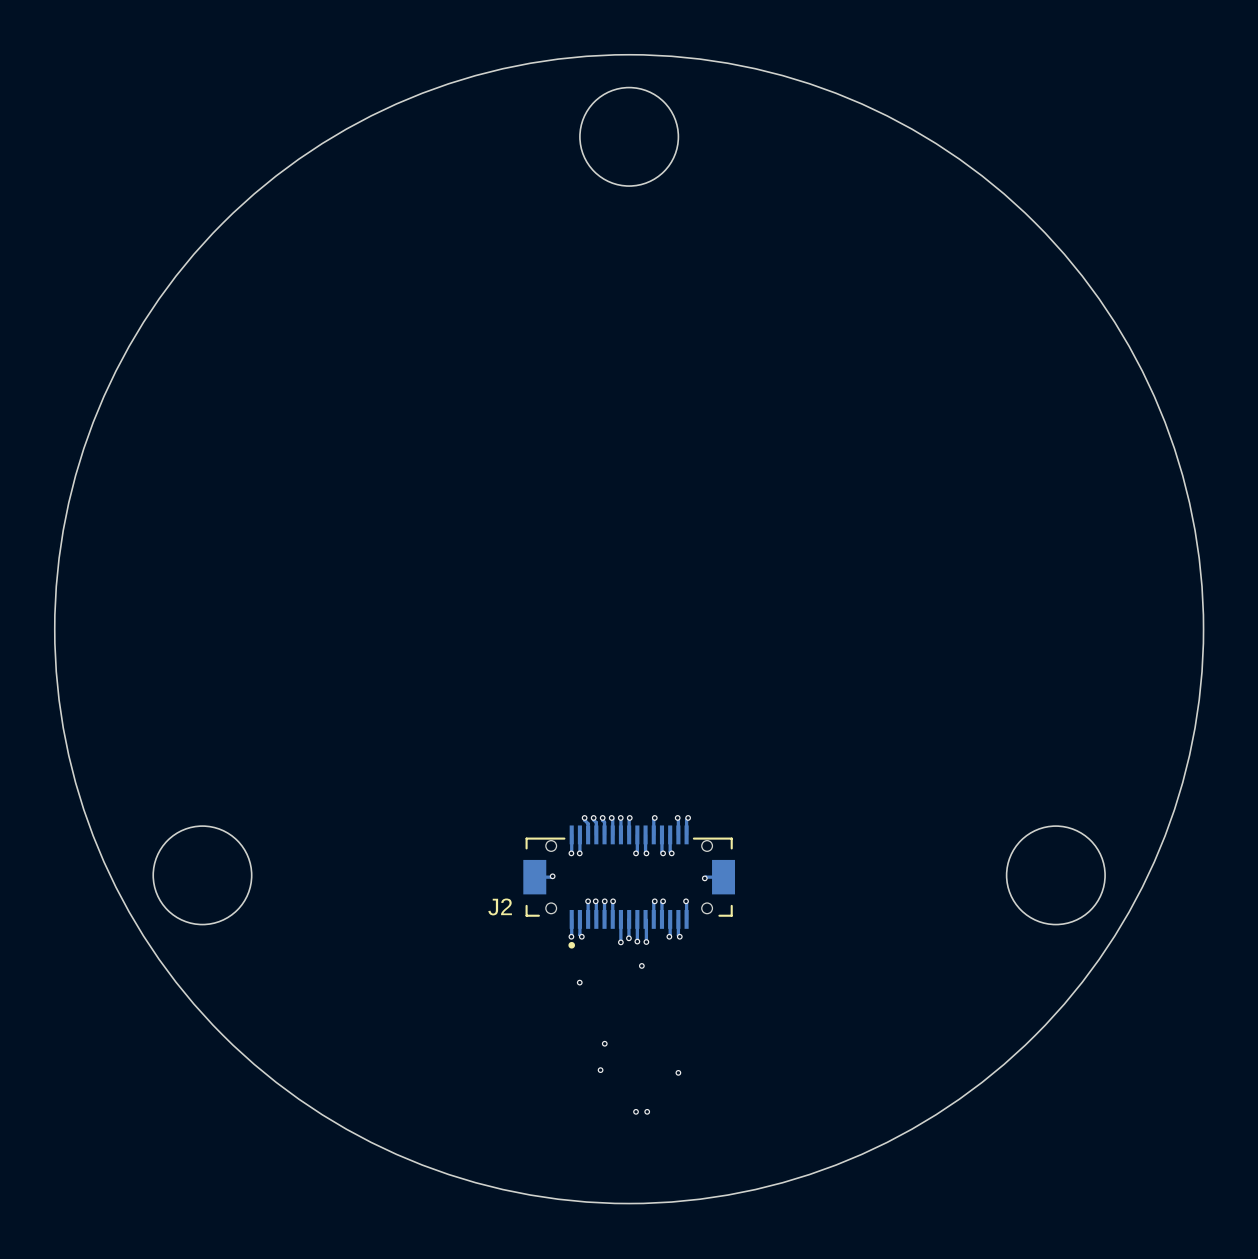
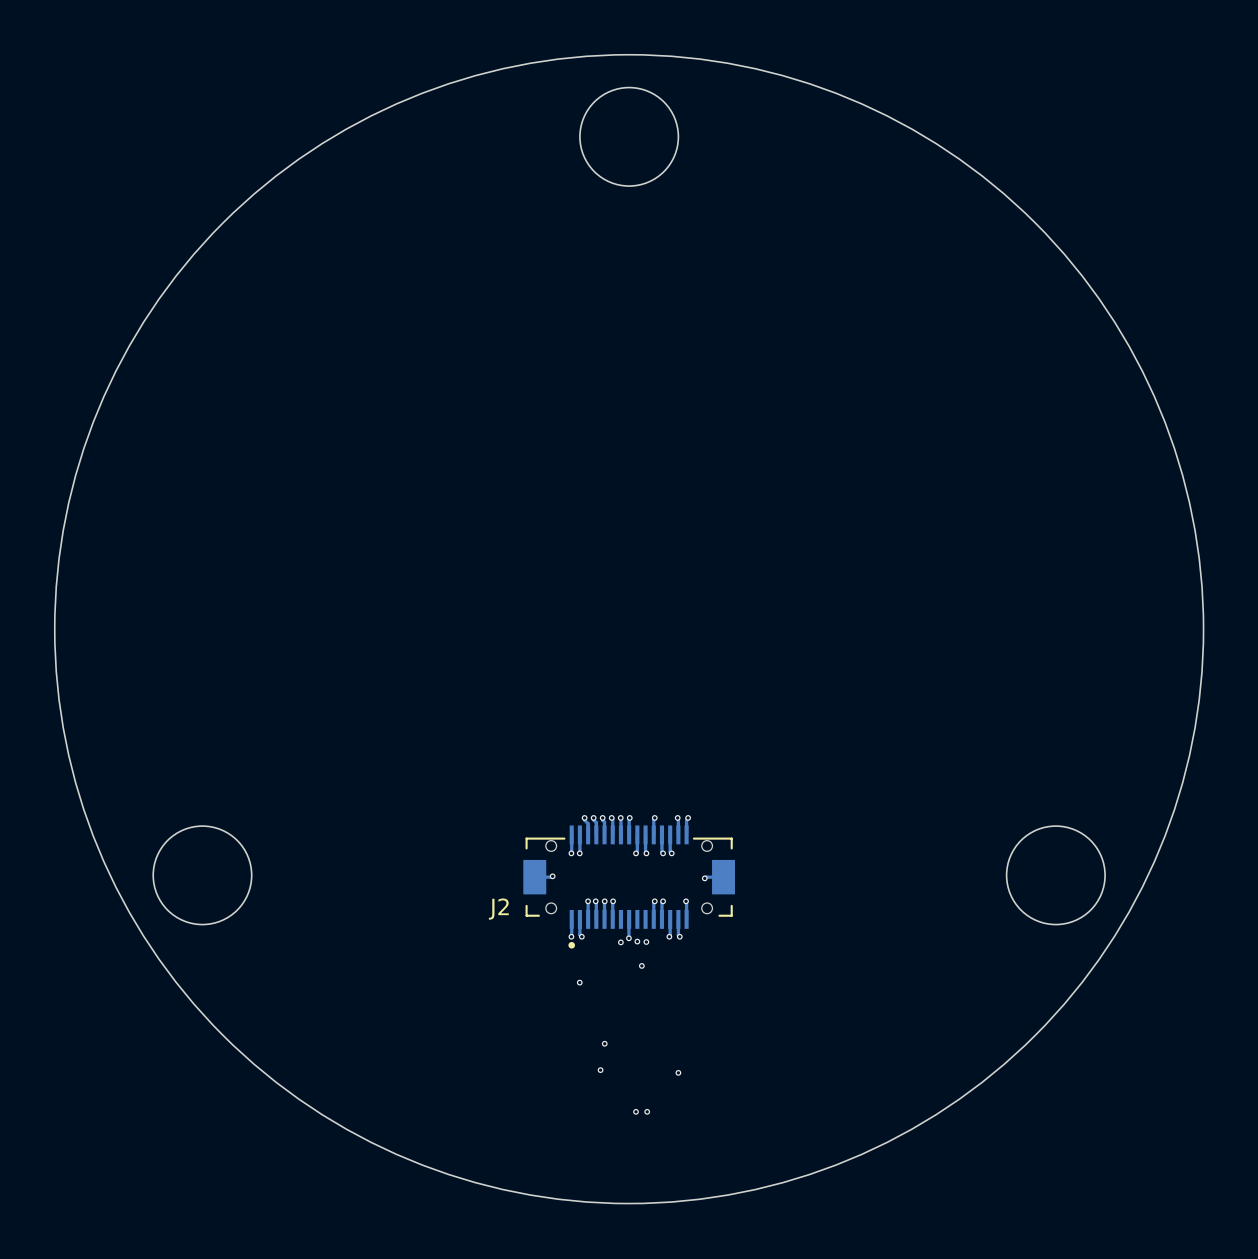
track: (620, 919) (620, 942) -> none
track: (637, 919) (637, 941) -> none
track: (645, 919) (646, 942) -> none

